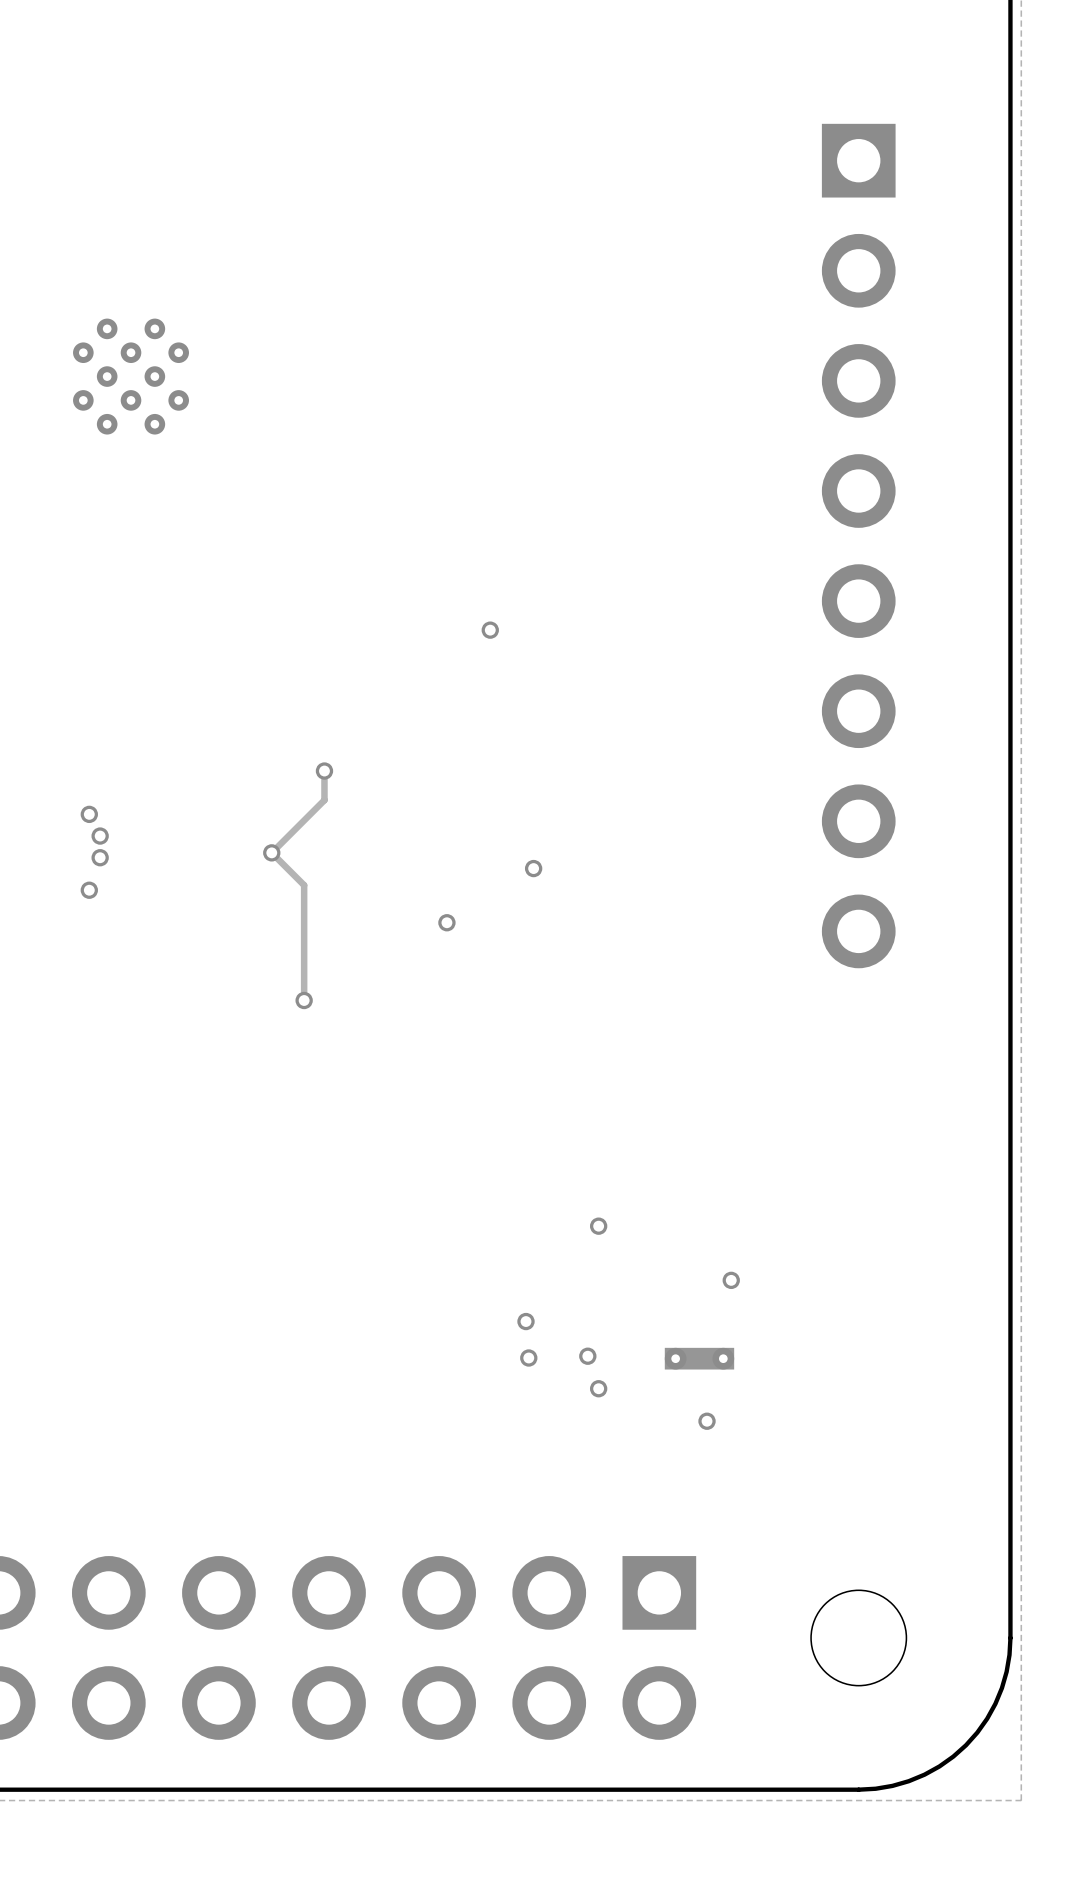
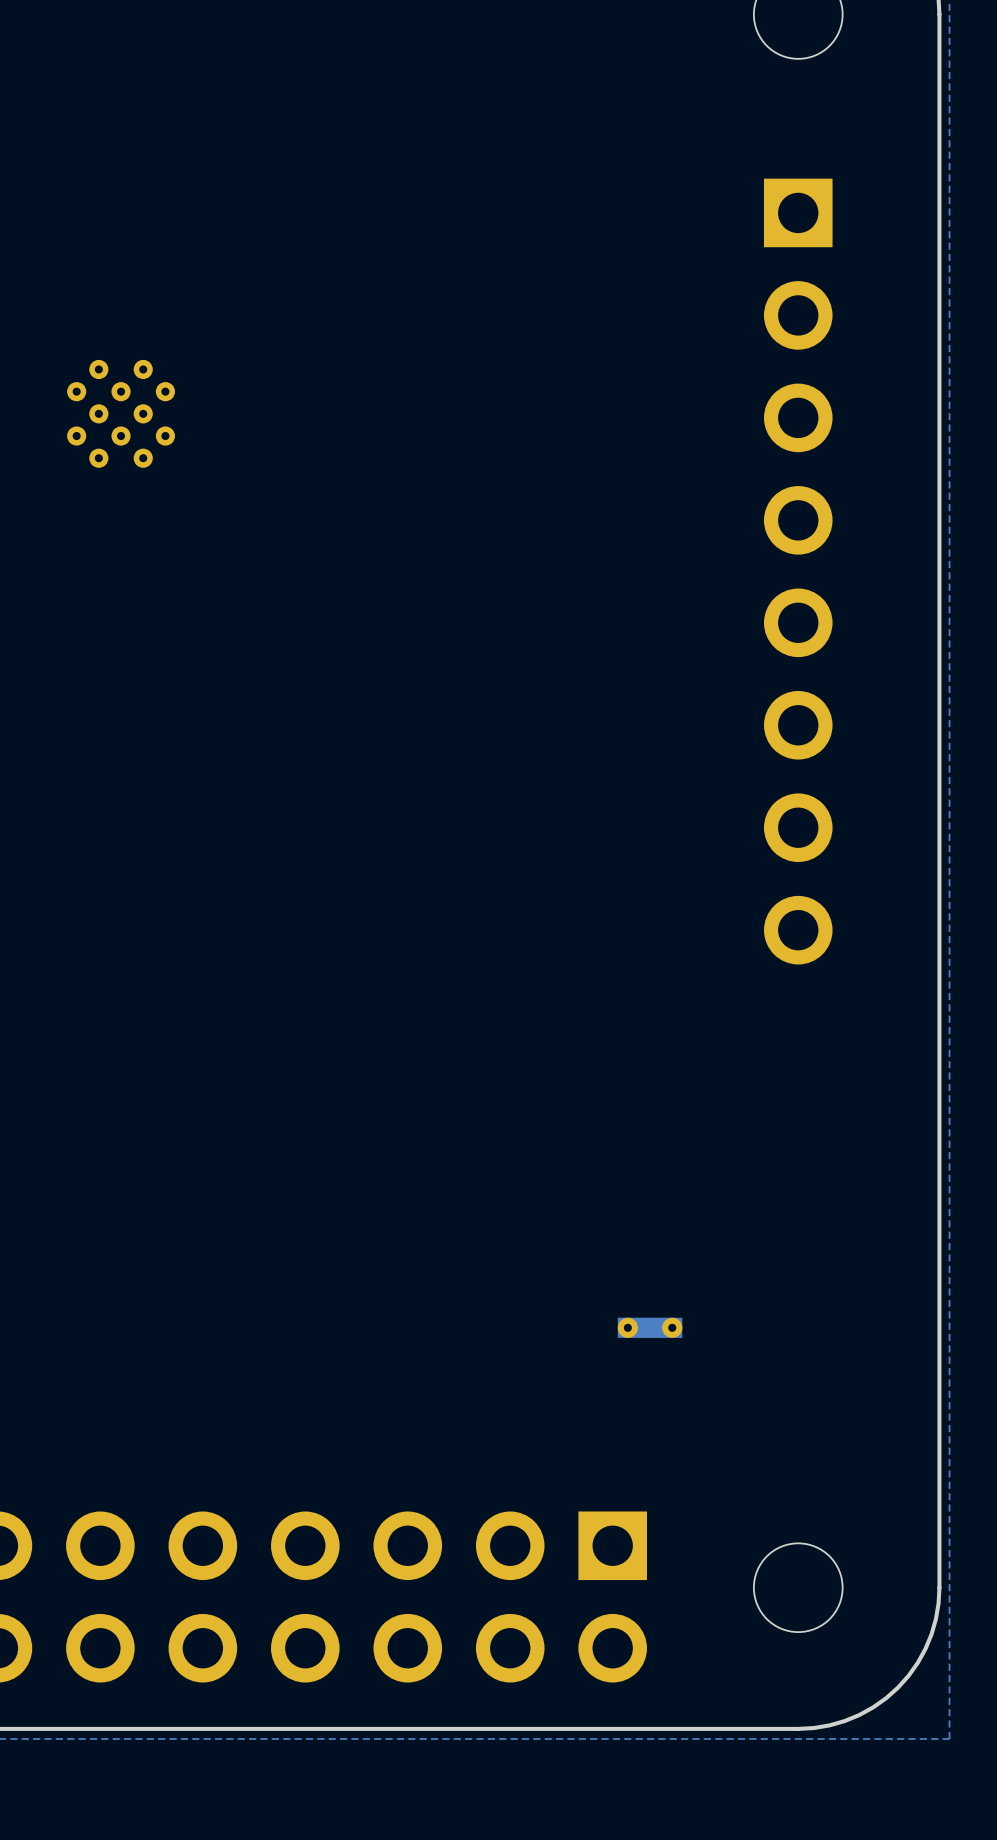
via: (490, 630) -> none
track: (324, 771) (324, 800) (271, 852) (304, 885) (304, 1000) -> none
via: (324, 771) -> none
via: (89, 814) -> none
via: (100, 836) -> none
via: (271, 852) -> none
via: (100, 857) -> none
via: (533, 868) -> none
via: (89, 890) -> none
via: (446, 922) -> none
via: (304, 1000) -> none
via: (598, 1226) -> none
via: (731, 1280) -> none
via: (526, 1321) -> none
via: (587, 1356) -> none
via: (528, 1358) -> none
via: (598, 1388) -> none
via: (707, 1421) -> none

